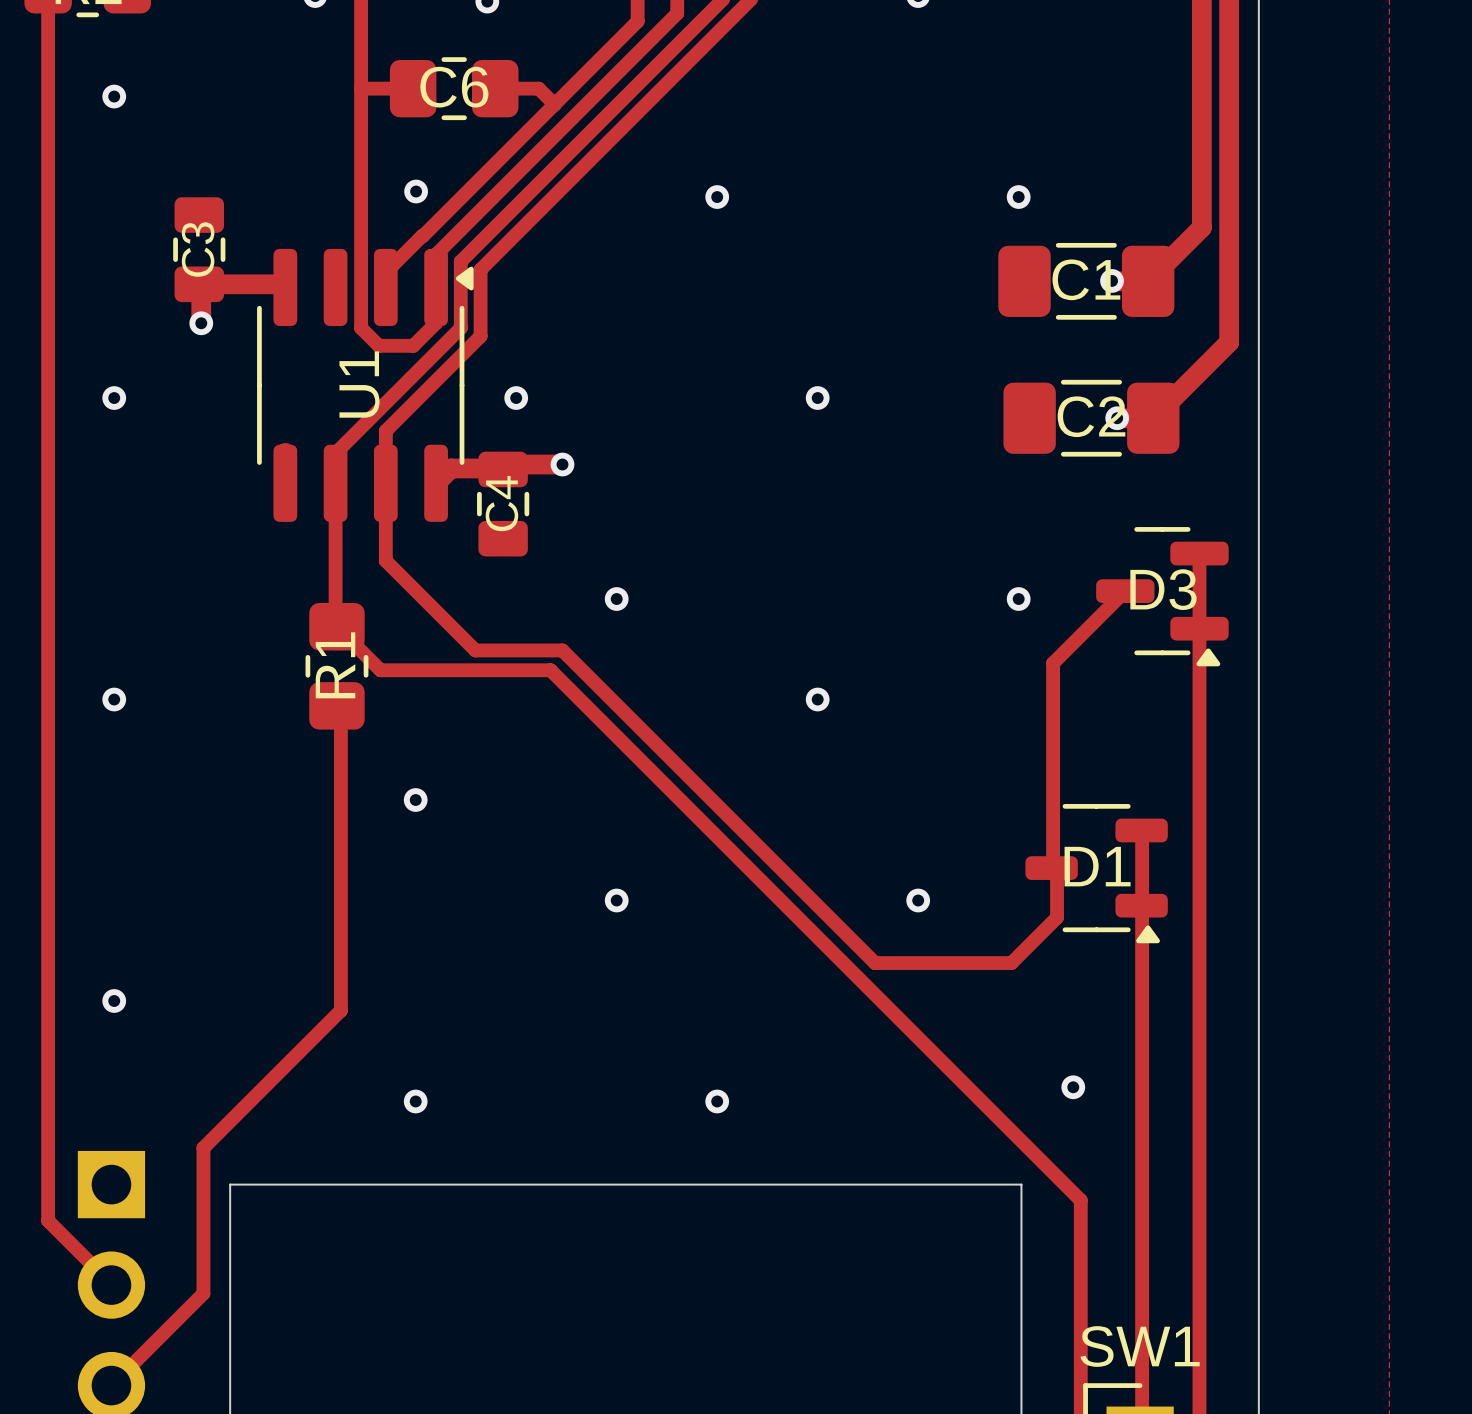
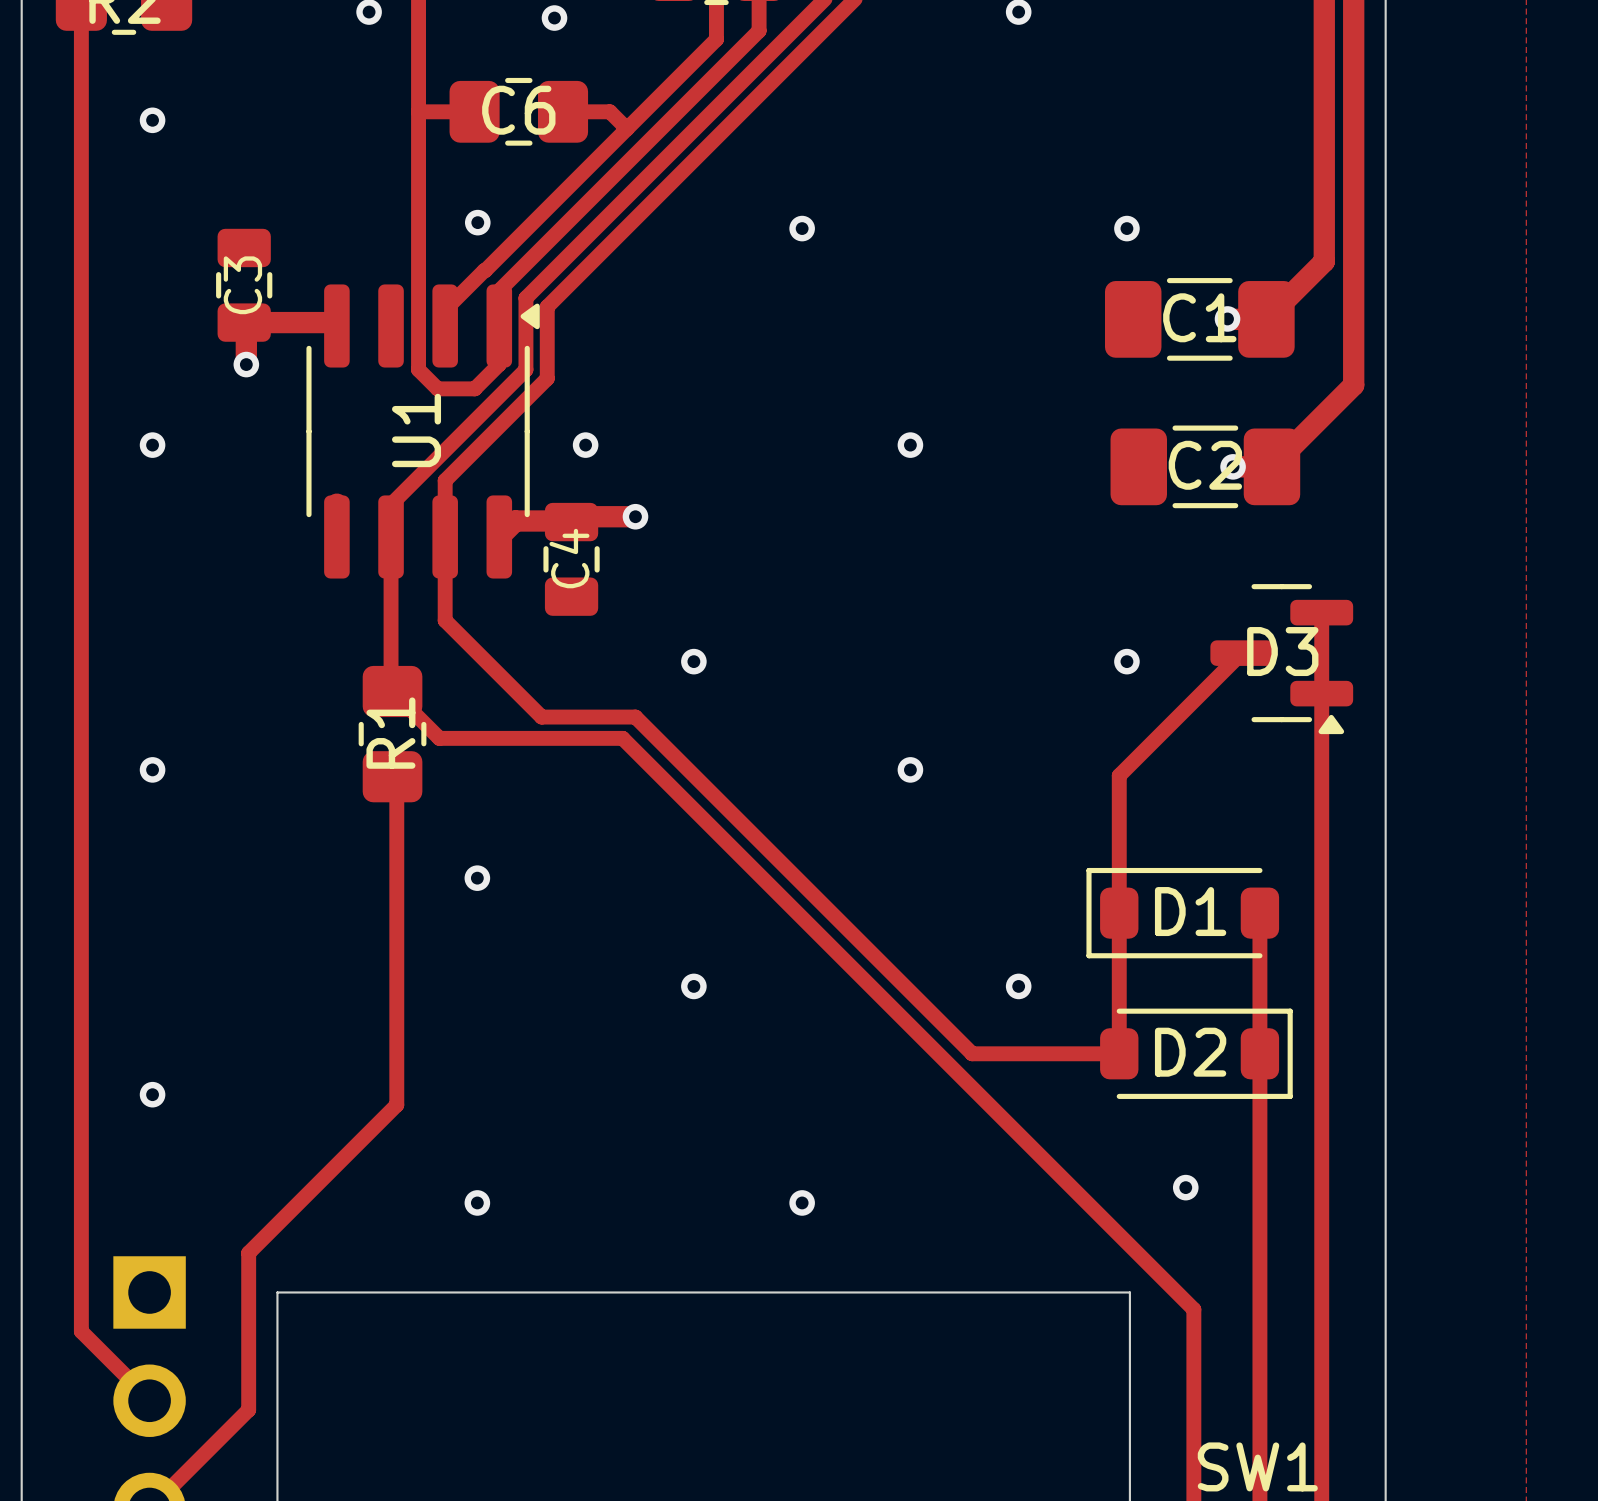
track: (1053, 663) (1053, 865) (1057, 869) (1057, 917) (1011, 963) -> (1164, 730) (1119, 775) (1119, 1053)
D1 footprint: [1025, 803, 1168, 944] -> [1086, 867, 1280, 959]
D2: none -> (1196, 1053)

